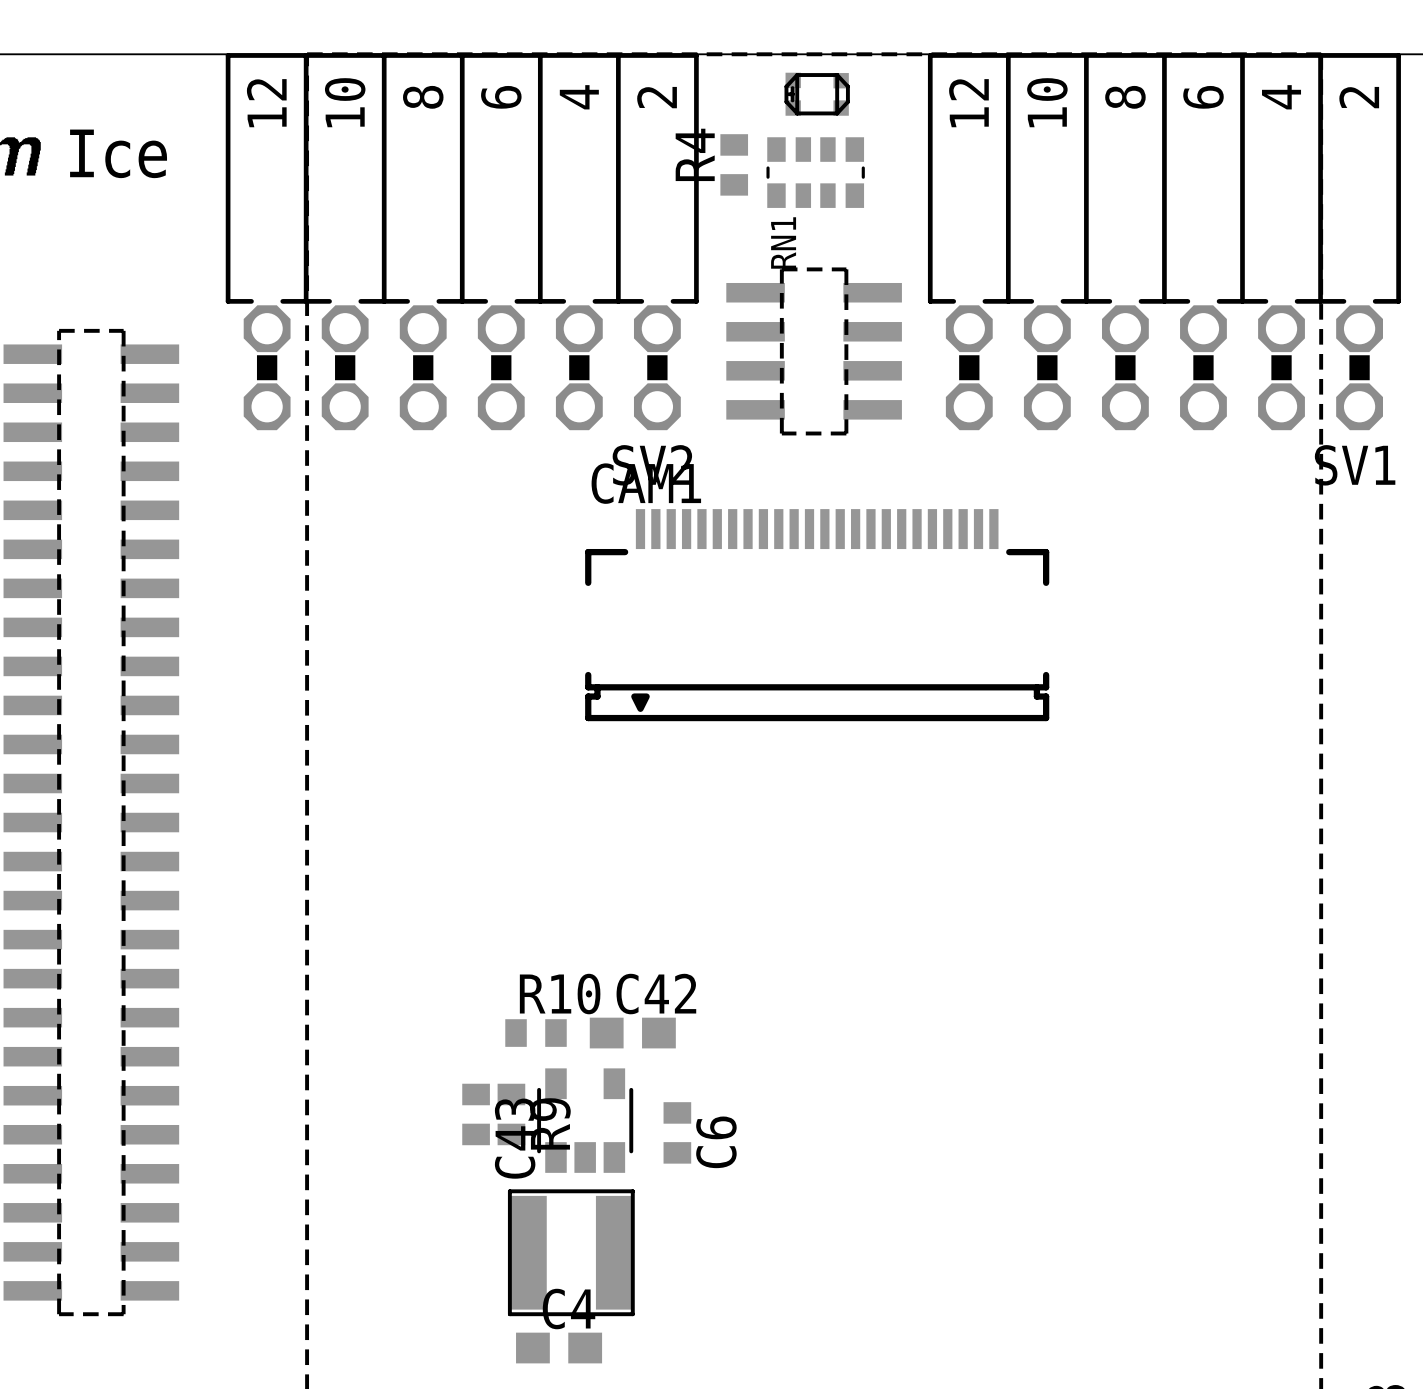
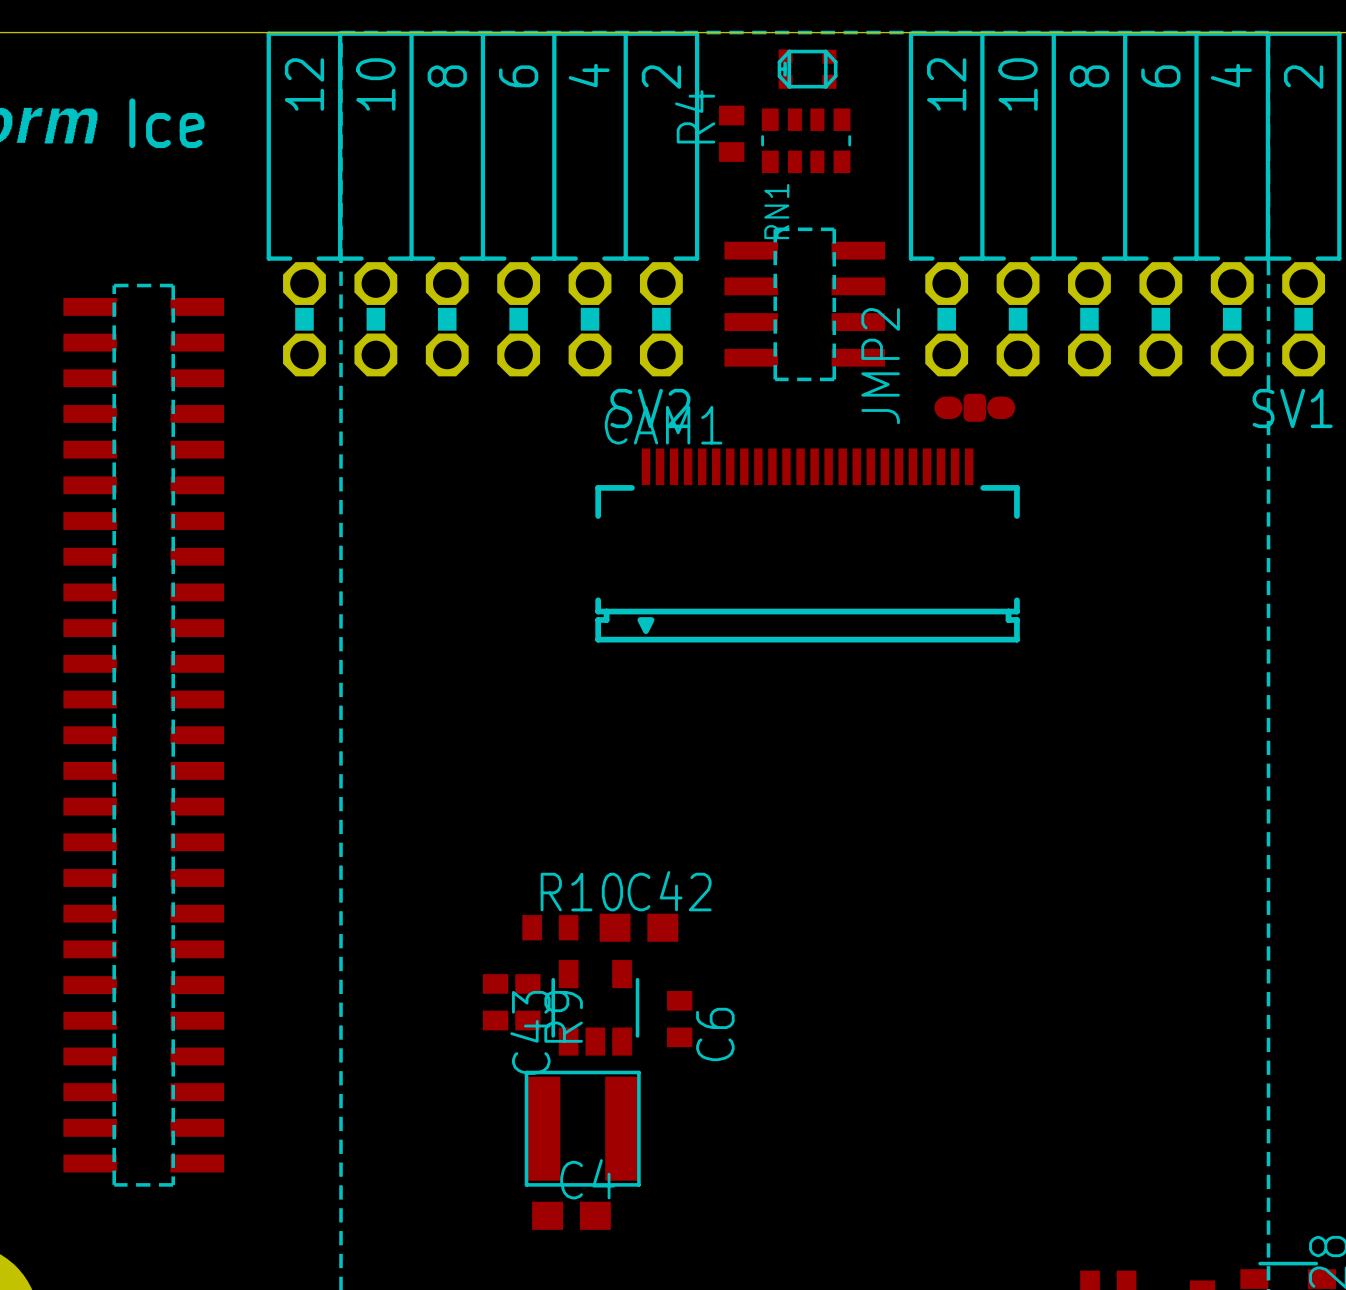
JMP2: none -> (974, 407)

